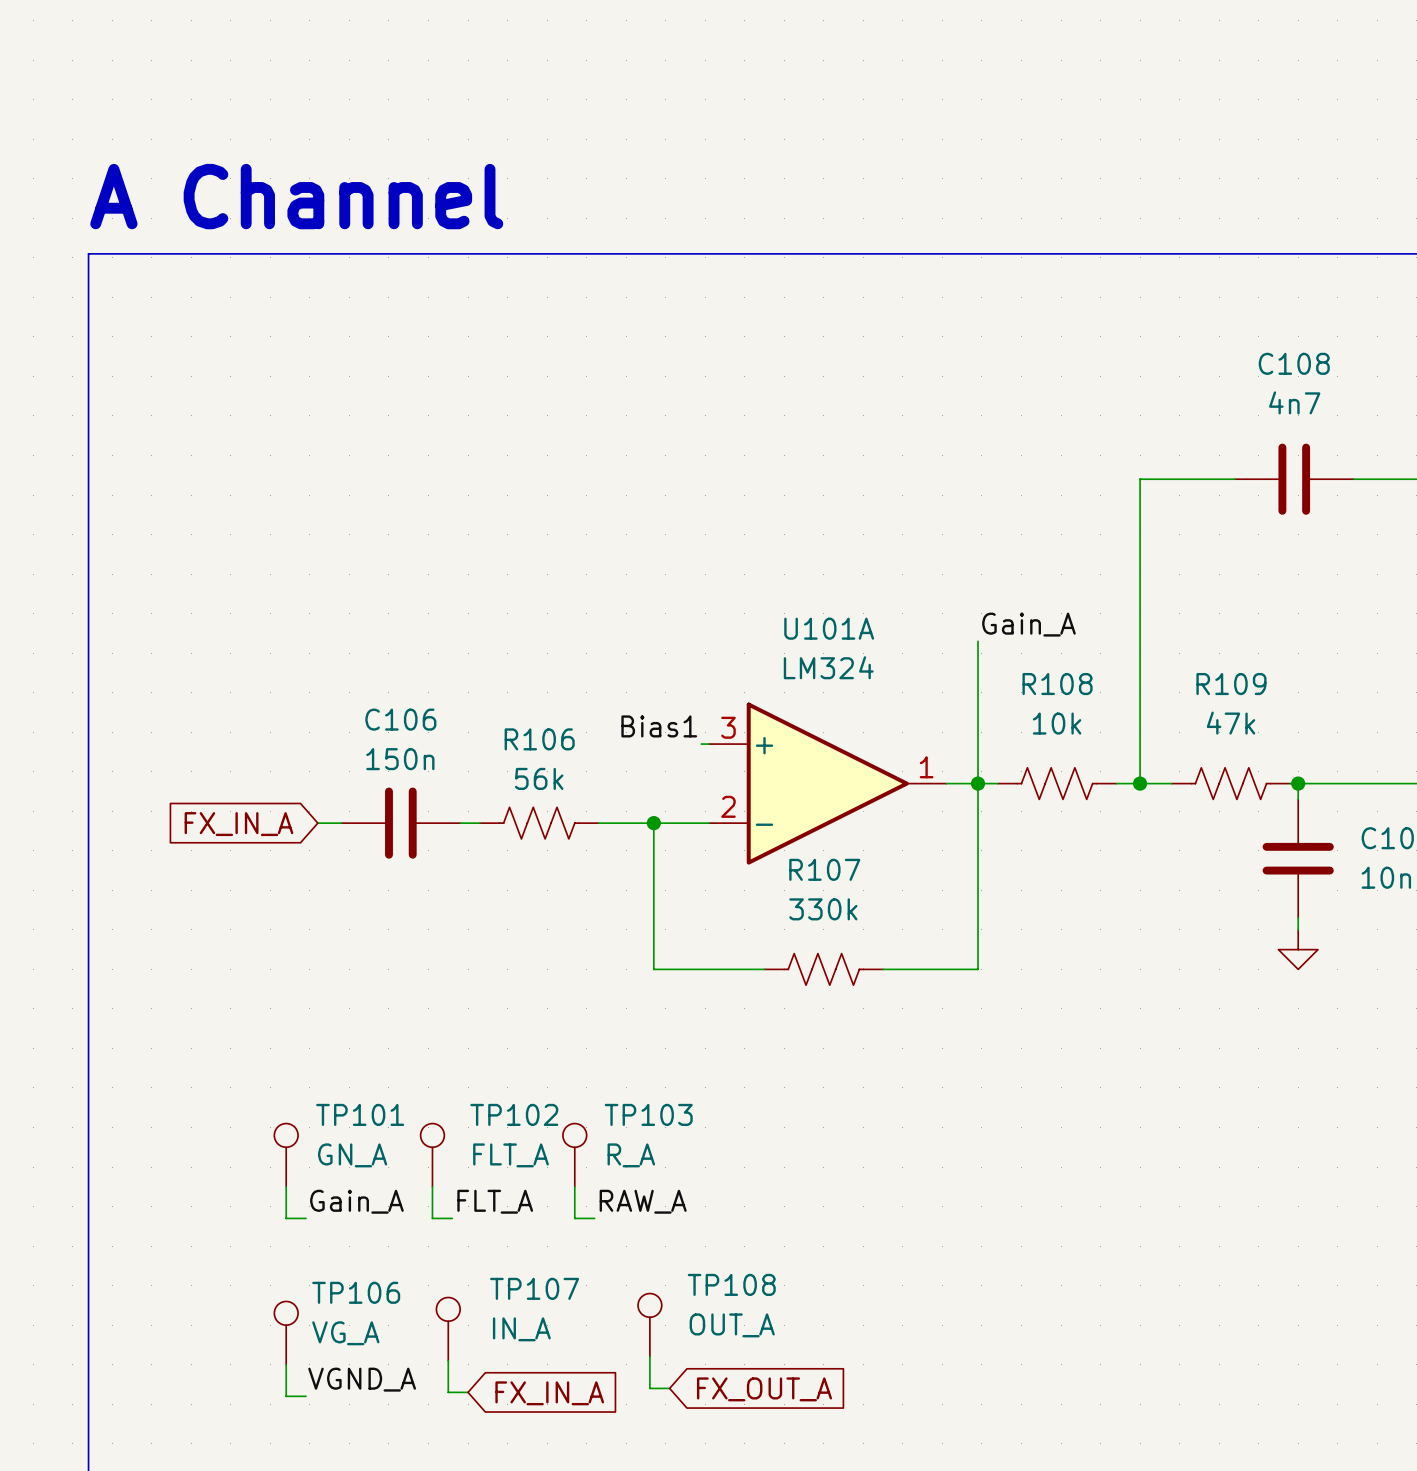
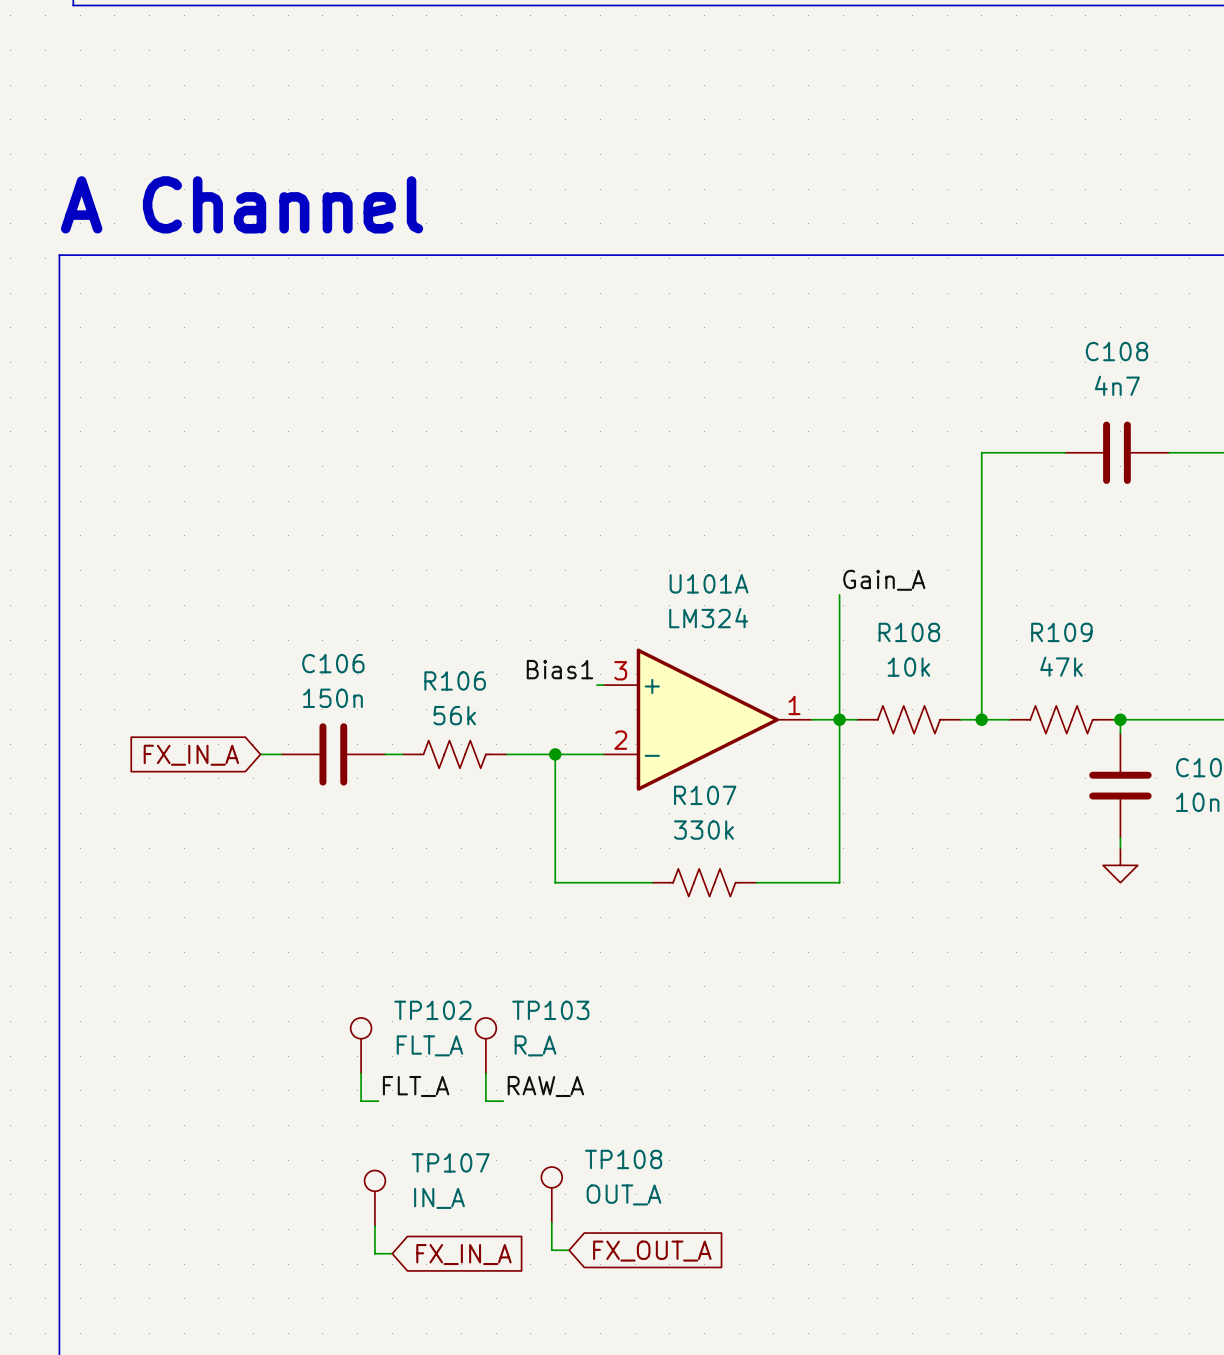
TP101: GN_A (286, 1155) -> none
wire: (286, 1186) (286, 1218) (305, 1218) -> none
label: Gain_A (356, 1201) -> none
TP106: VG_A (286, 1333) -> none
wire: (286, 1364) (286, 1396) (305, 1396) -> none
label: VGND_A (362, 1379) -> none

